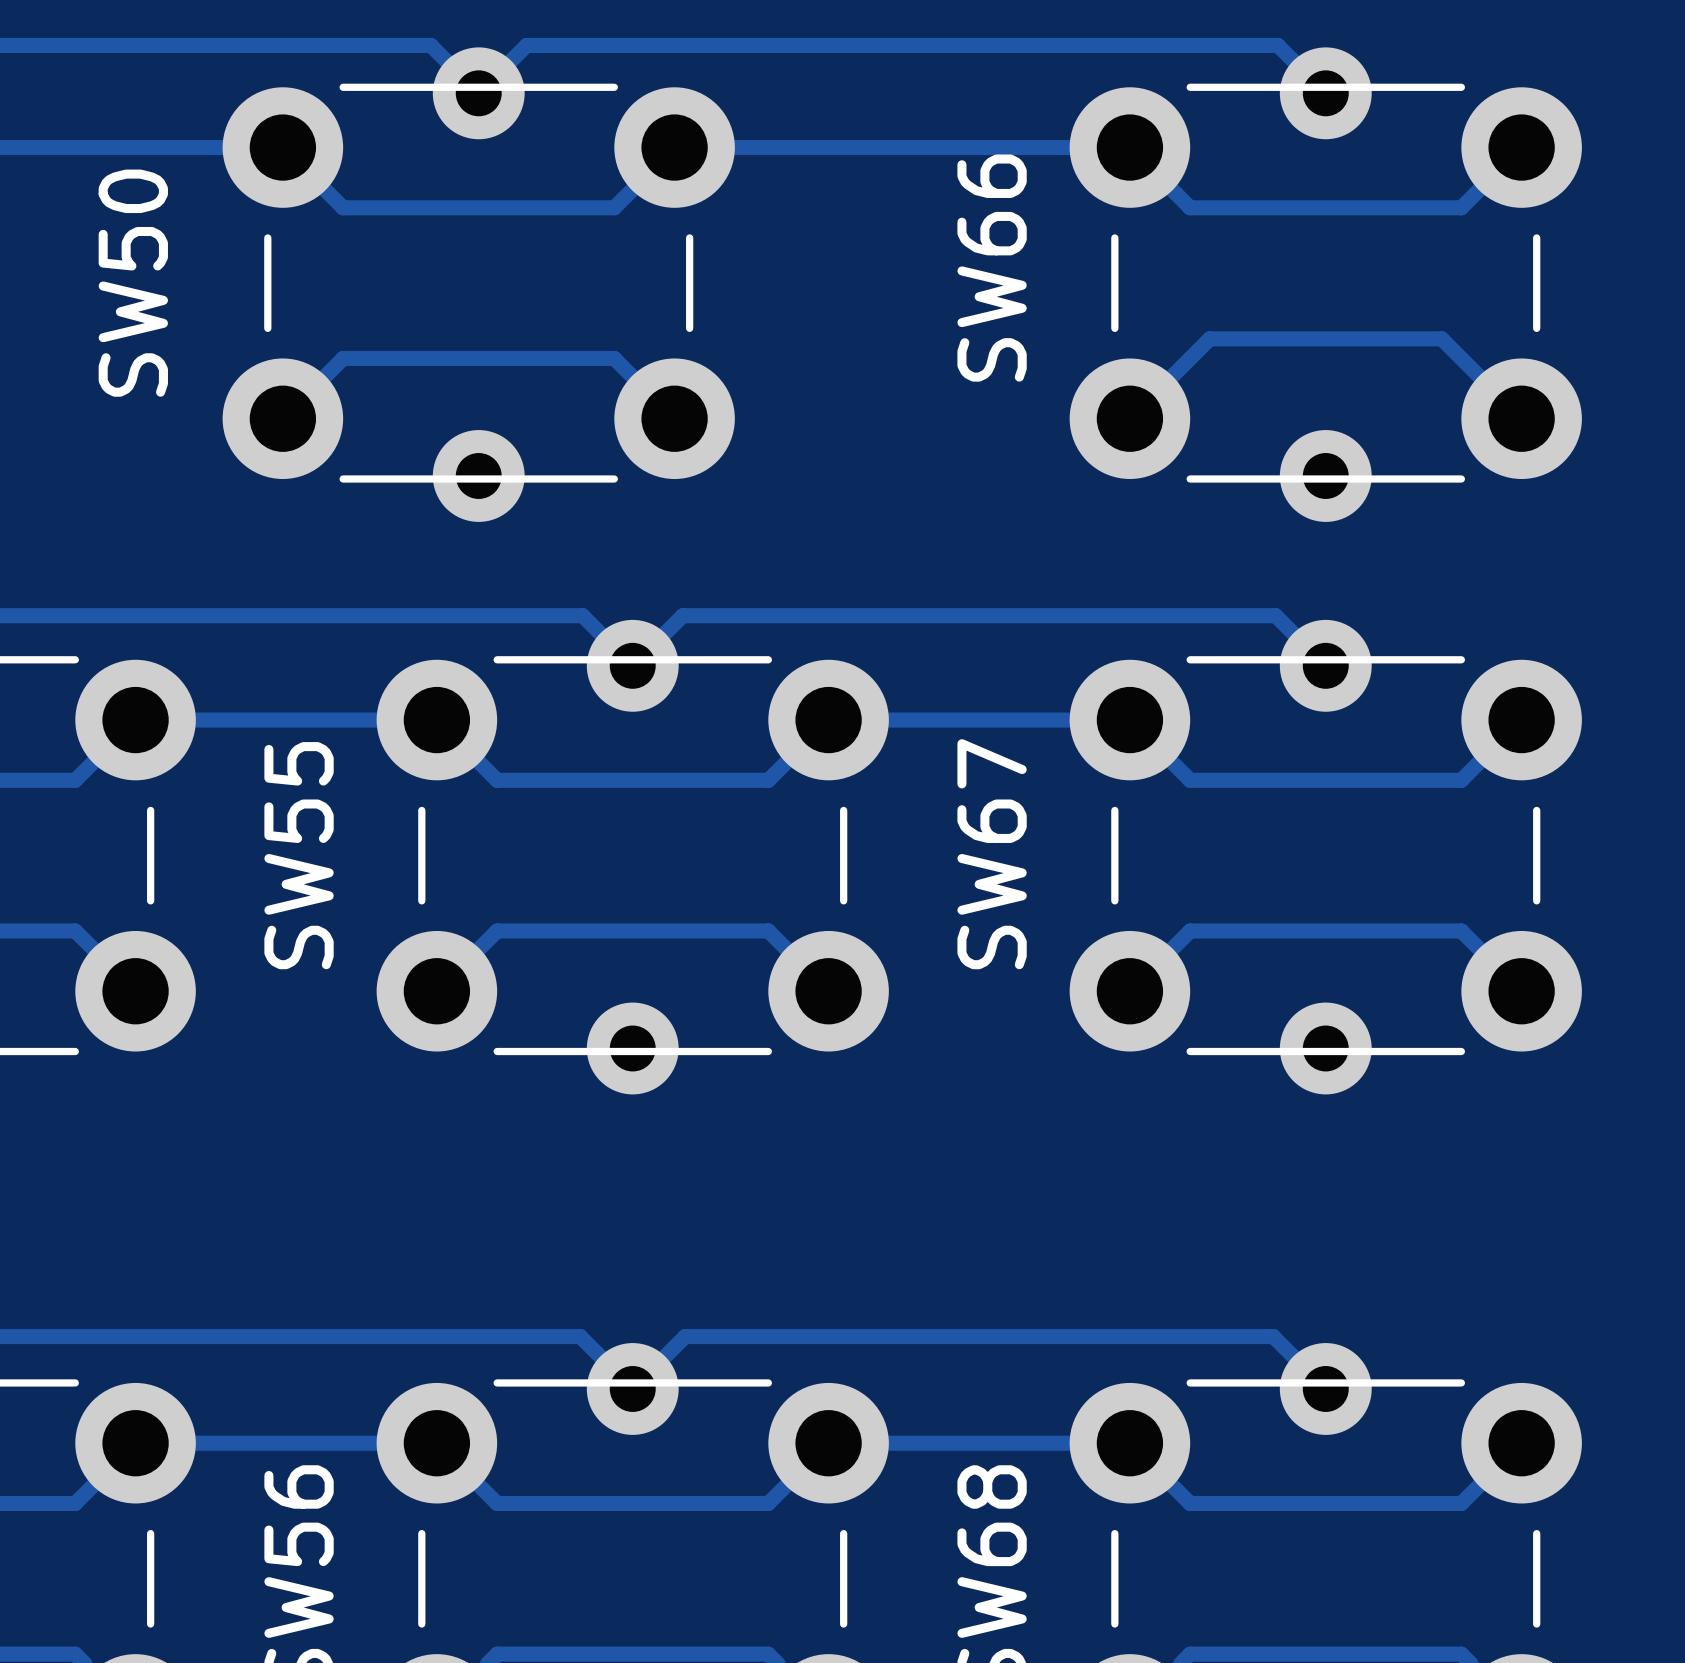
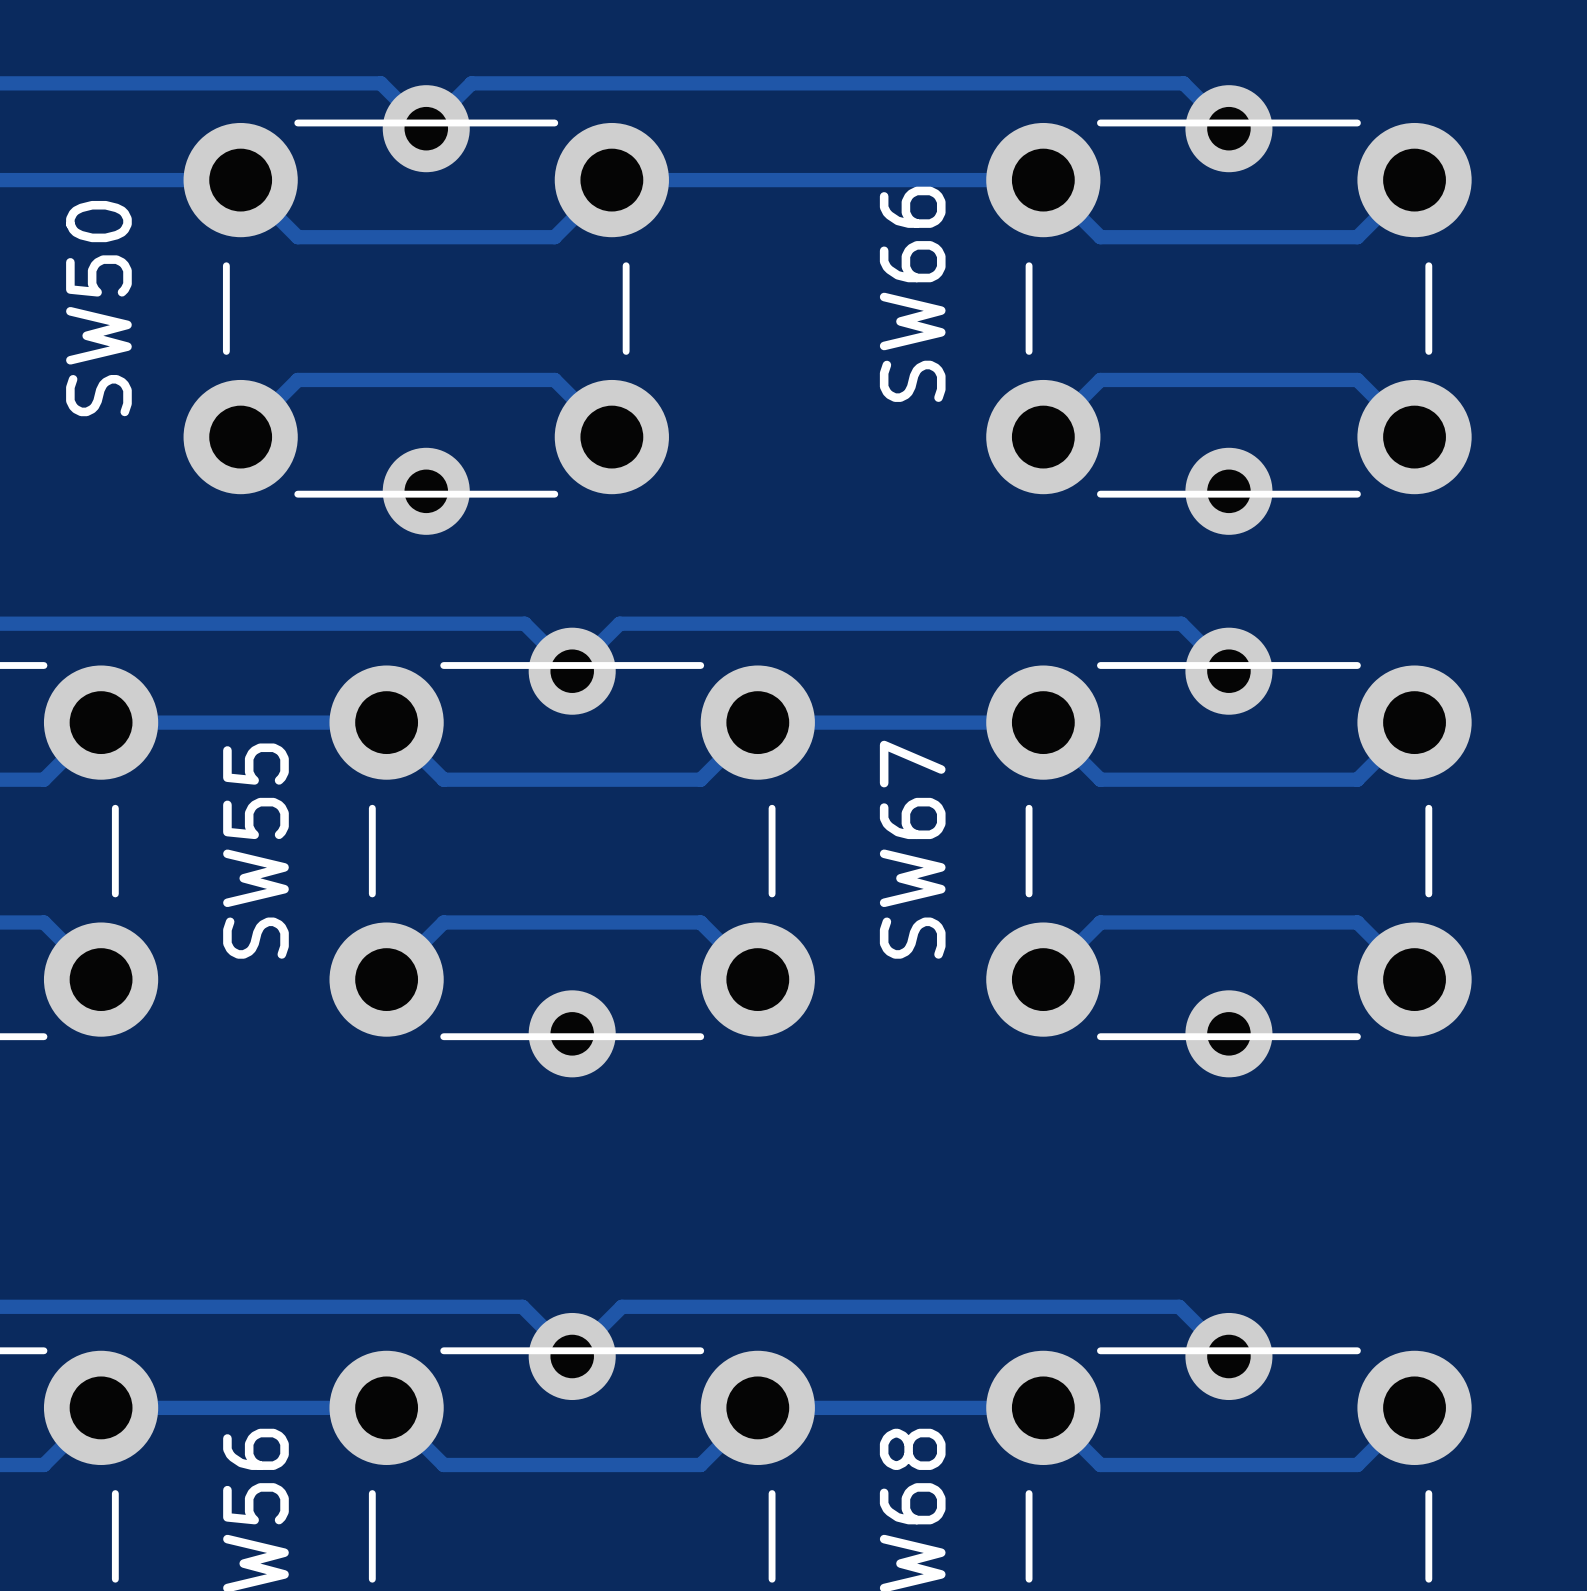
track: (1190, 358) (1209, 338) (1441, 338) (1461, 358) -> (1100, 379) (1357, 379)

